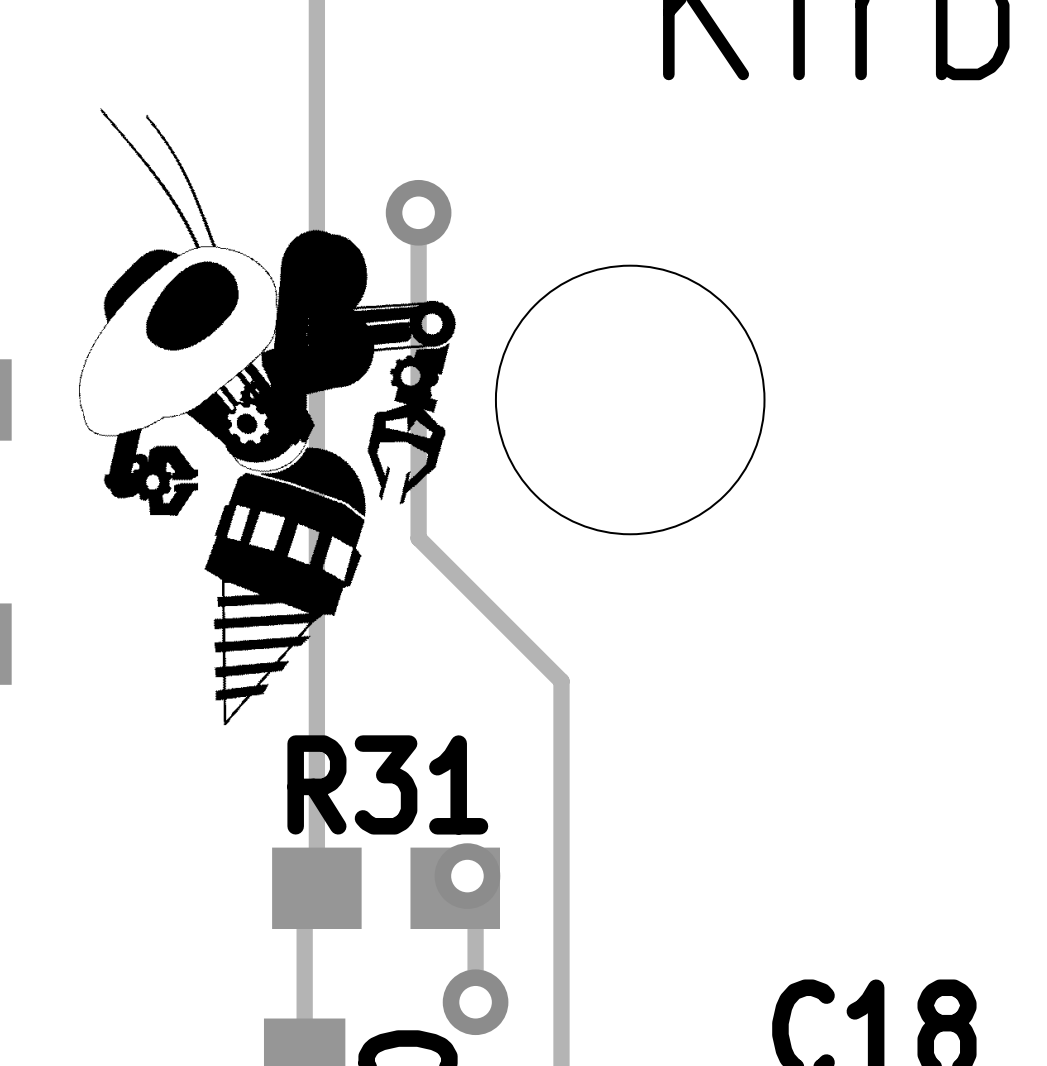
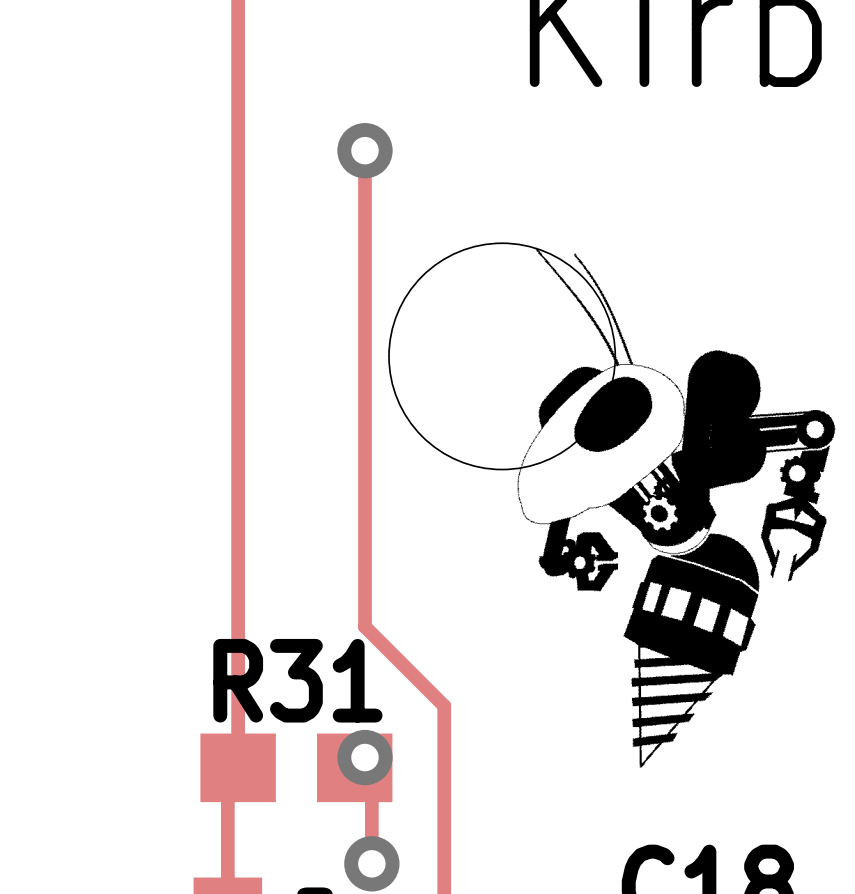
track: (418, 212) (418, 538) (561, 681) (561, 814) -> (365, 150) (365, 626) (444, 706)
via position: (418, 212) -> (365, 150)
drawing position: (267, 416) -> (676, 507)

